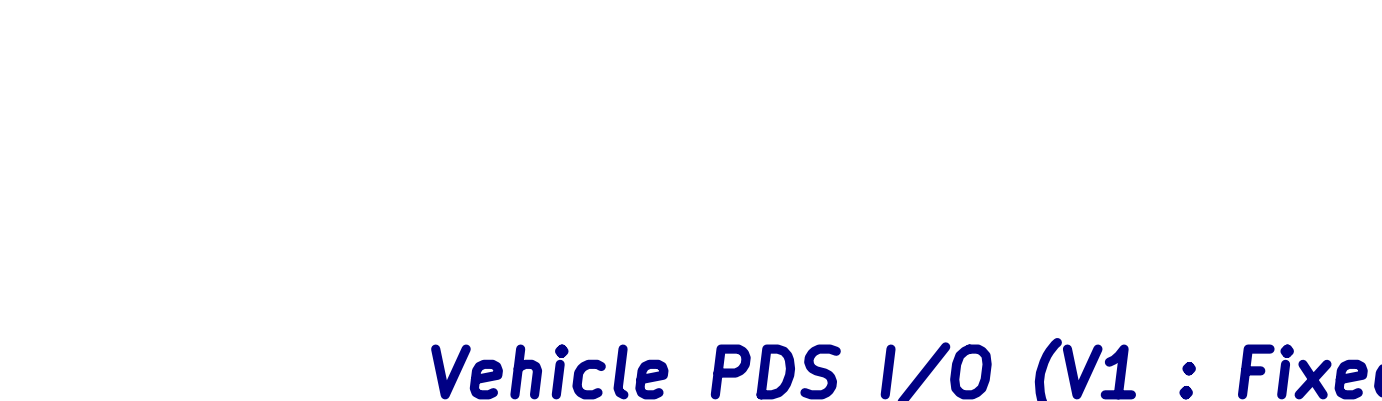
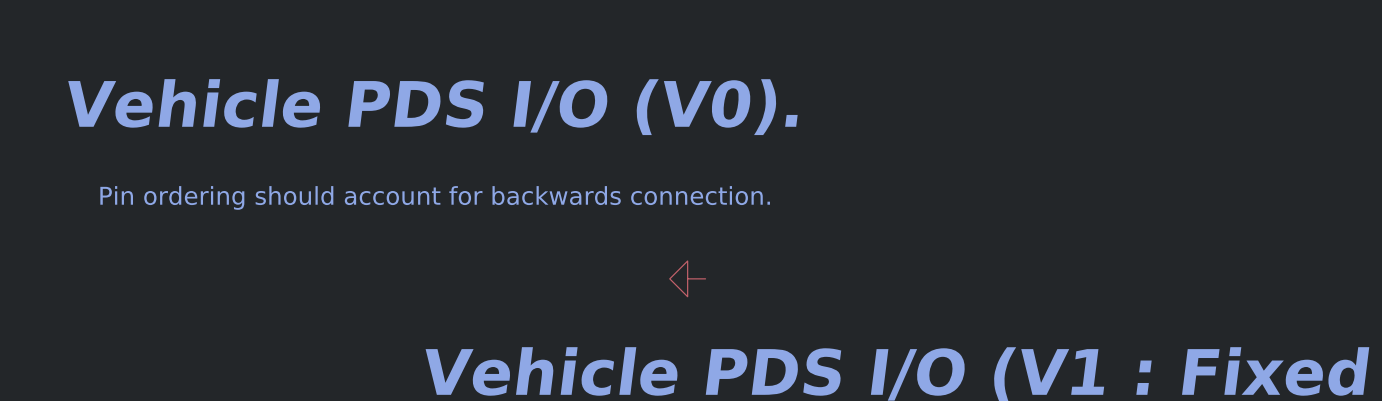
text: none -> Vehicle PDS I/O (V0). (432, 107)
text: none -> Pin ordering should account for backwards connection. (435, 197)
power symbol: none -> (687, 278)

